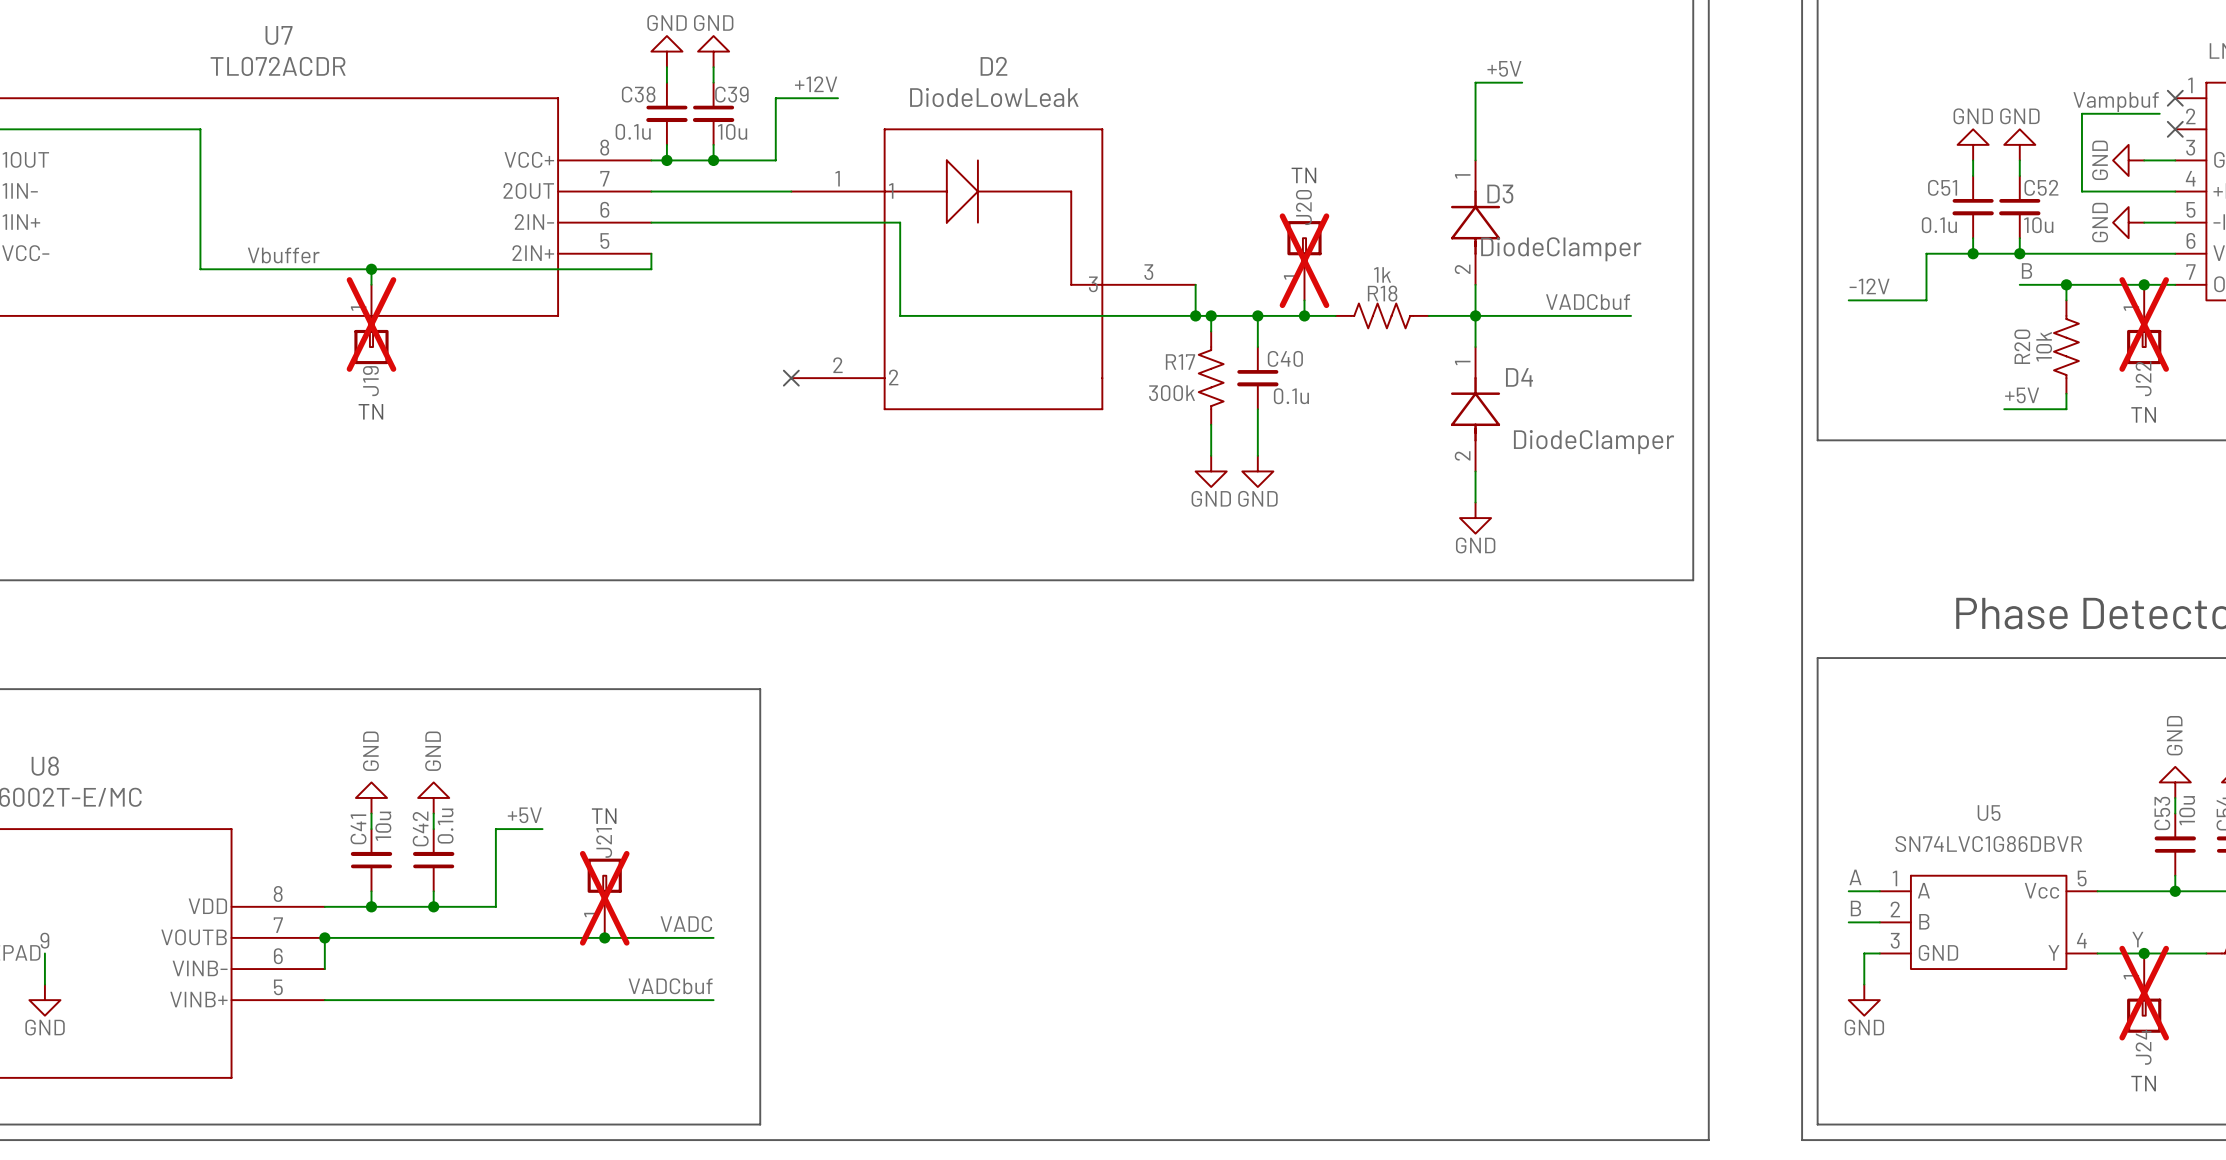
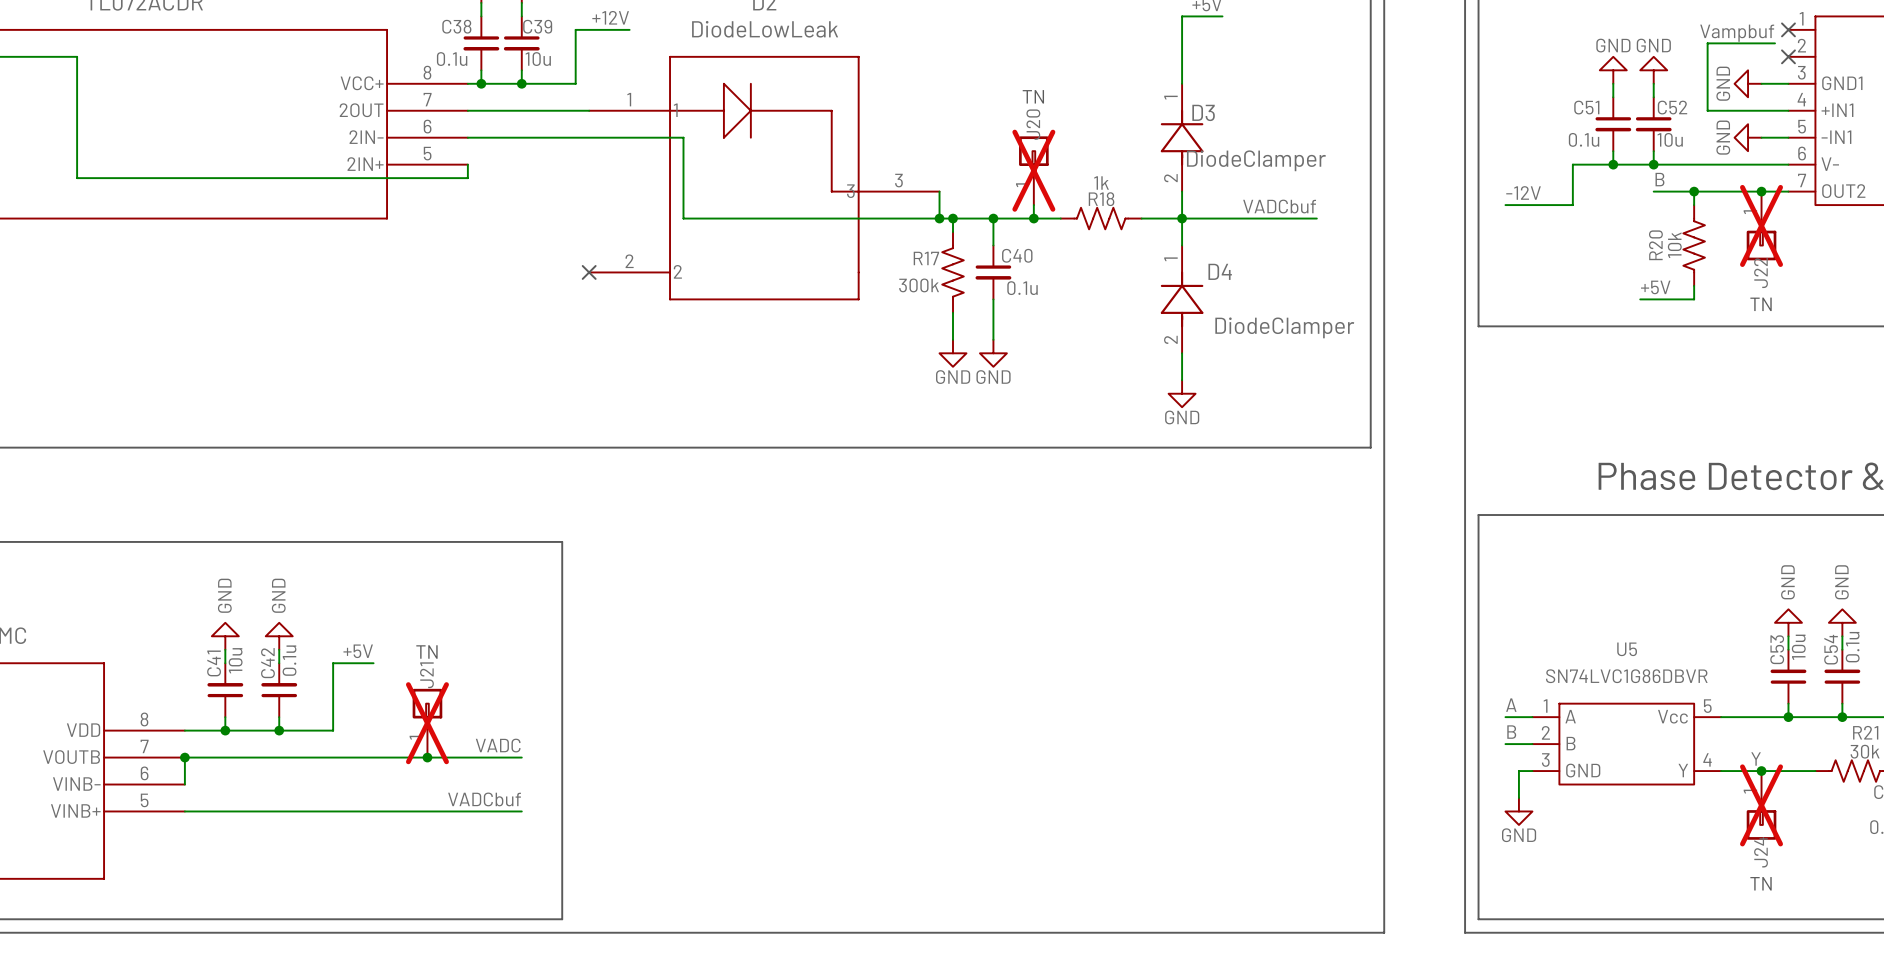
label: Vbuffer (283, 255) -> none
wire: (371, 269) (371, 284) -> none
junction: (371, 269) -> none
J19: (371, 324) -> none
text: TN (370, 411) -> none

